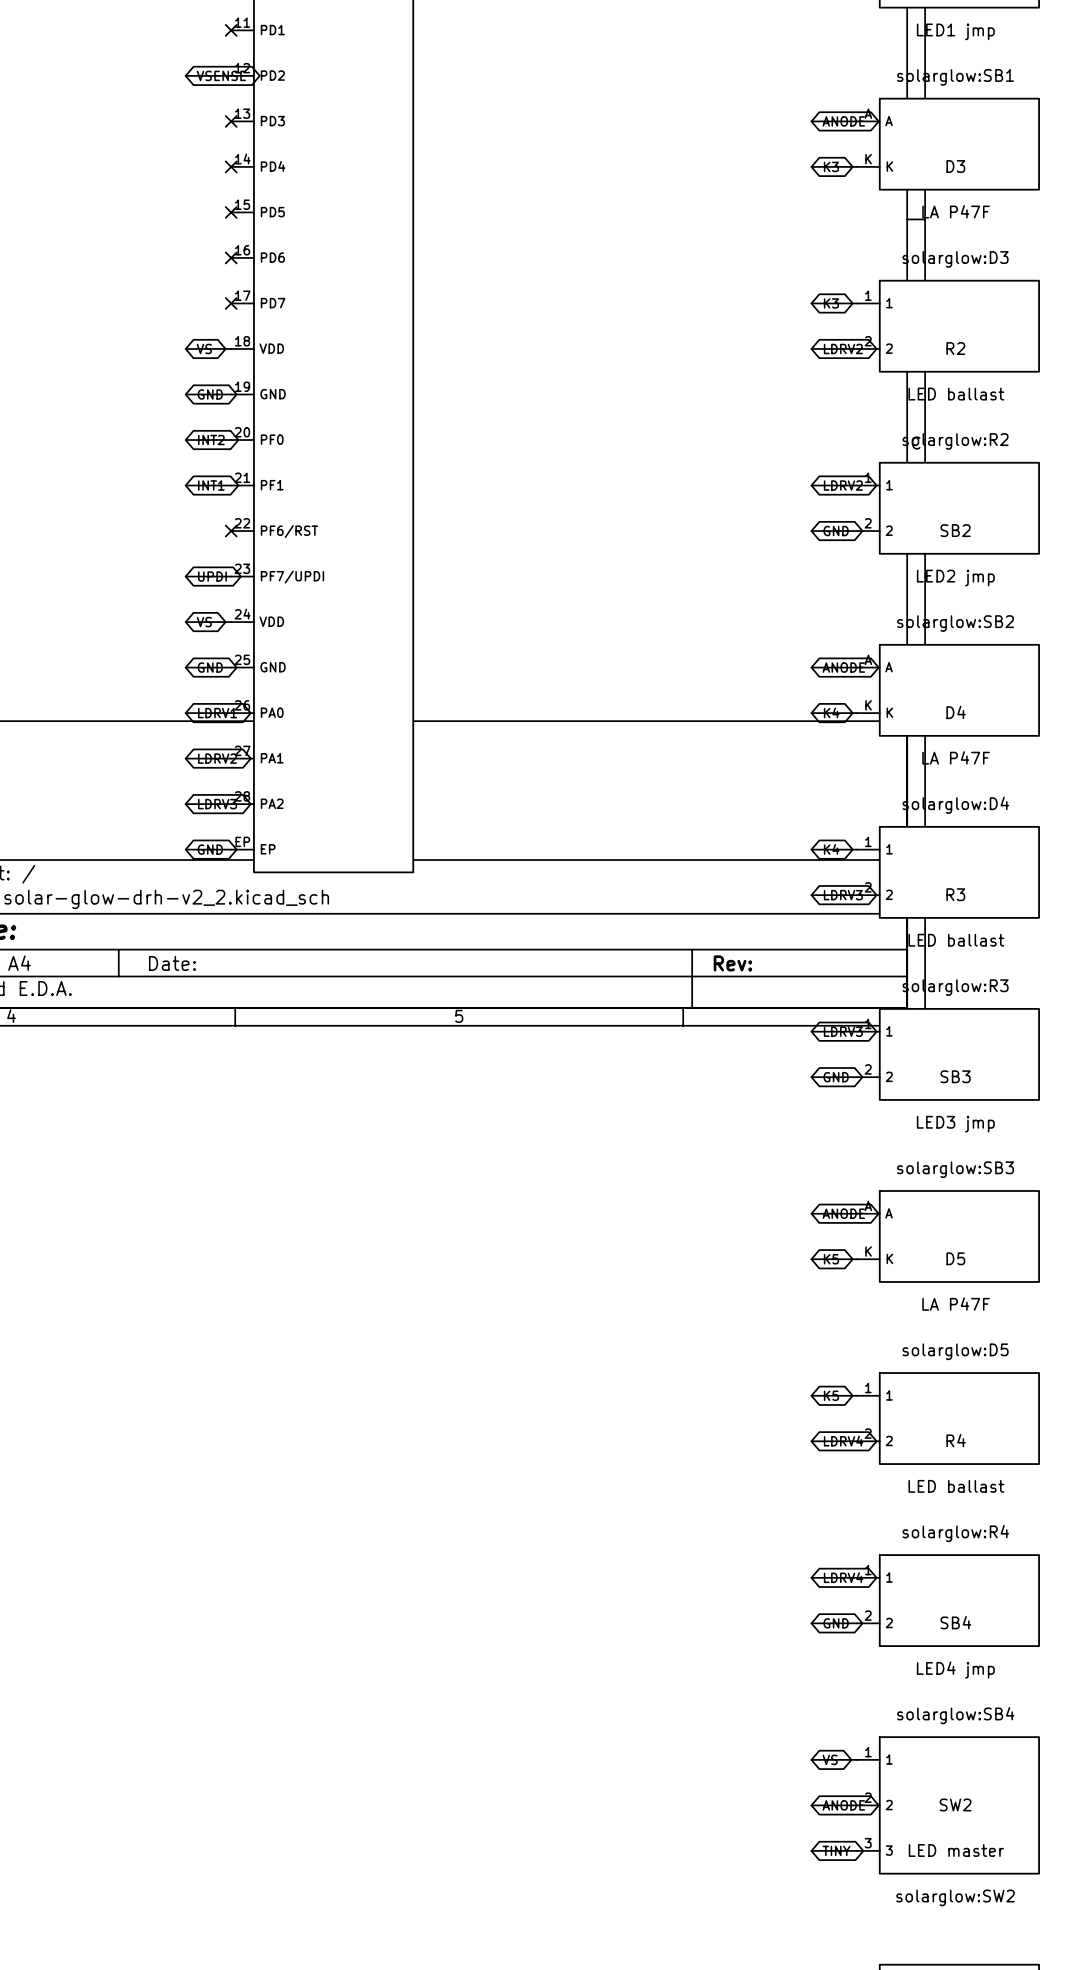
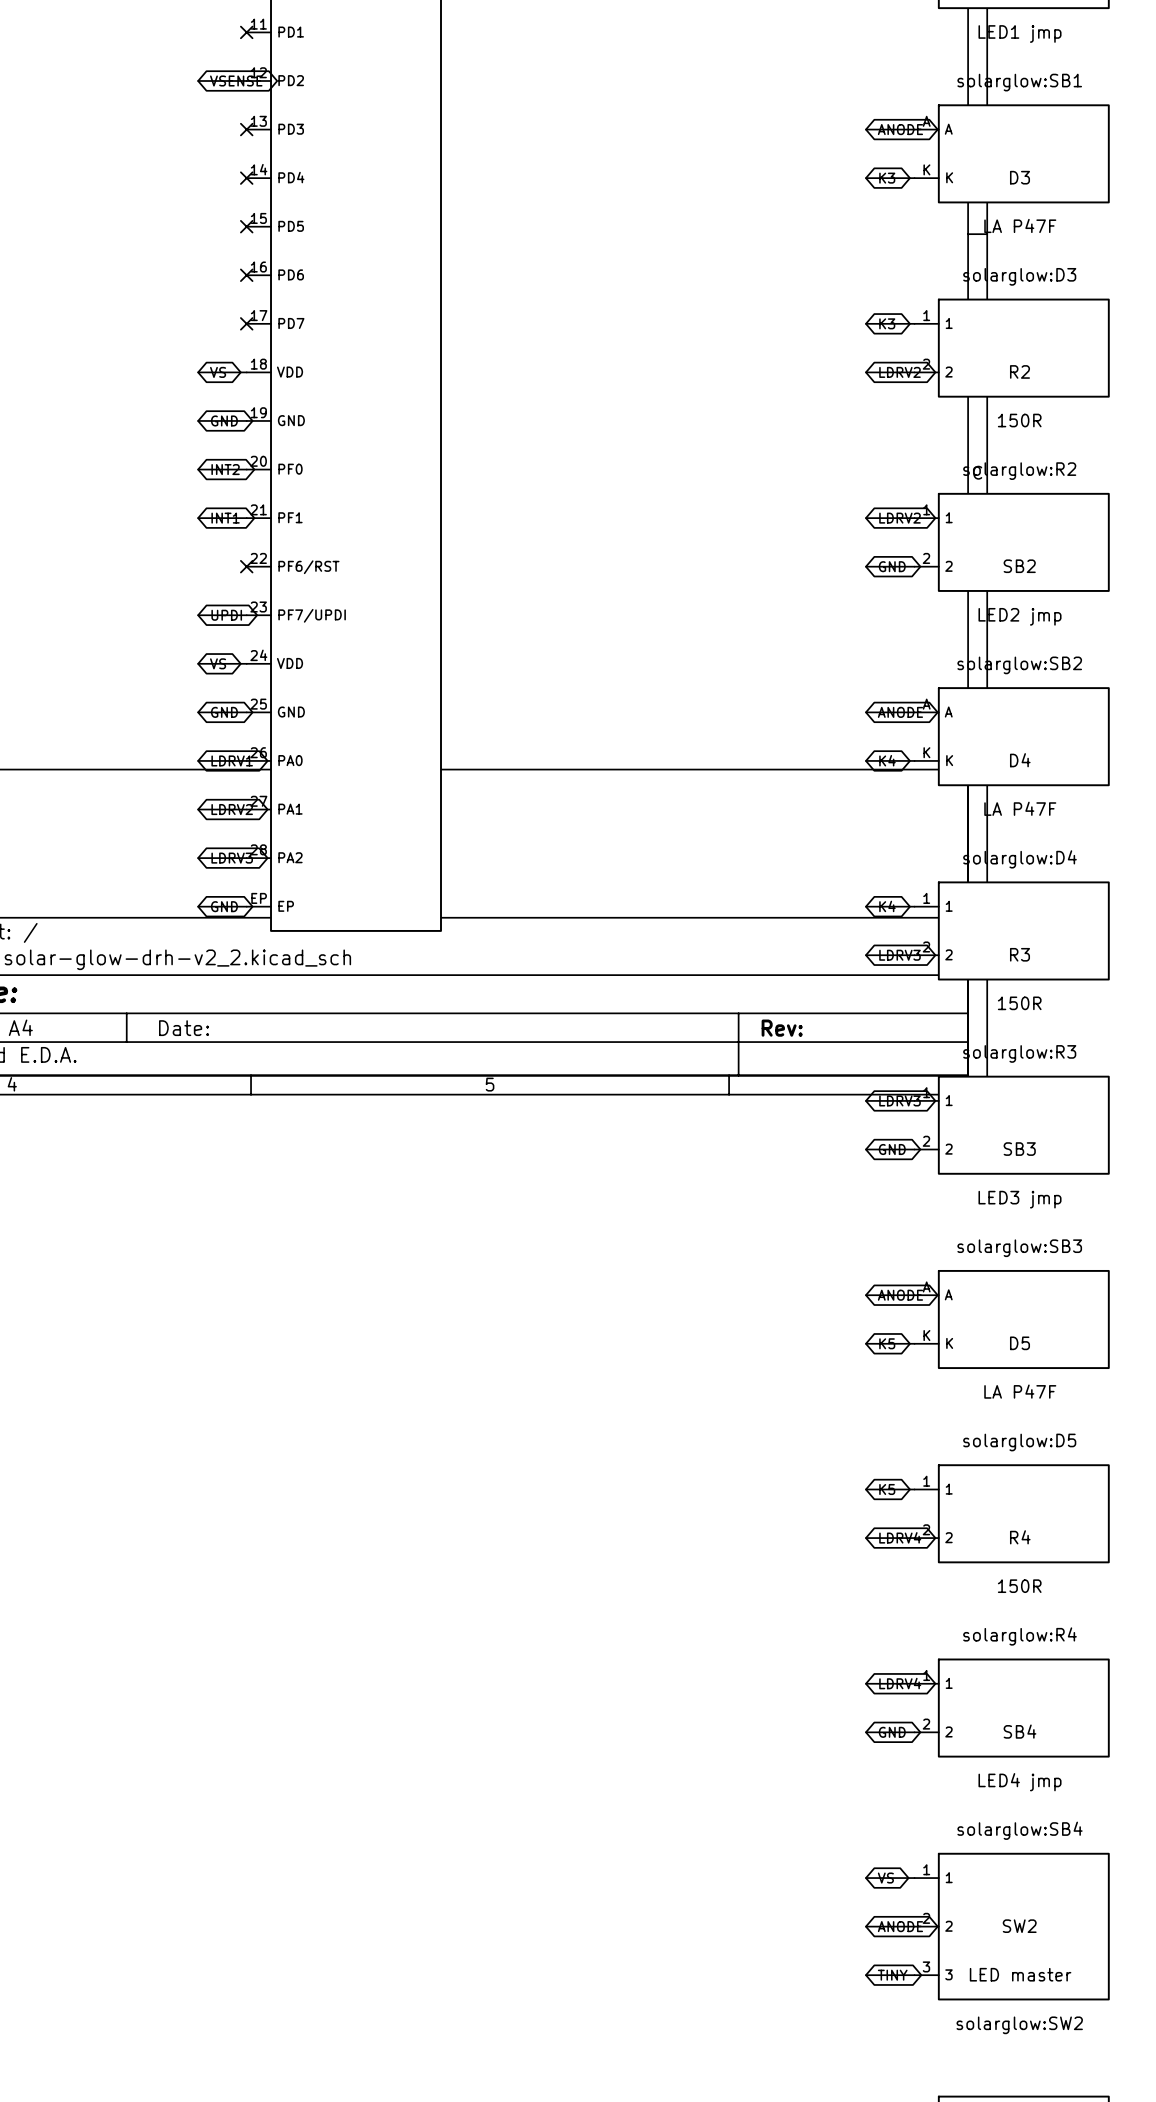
R2 value: LED ballast (956, 394) -> 150R (1019, 420)
R3 value: LED ballast (956, 940) -> 150R (1019, 1003)
R4 value: LED ballast (956, 1486) -> 150R (1019, 1586)

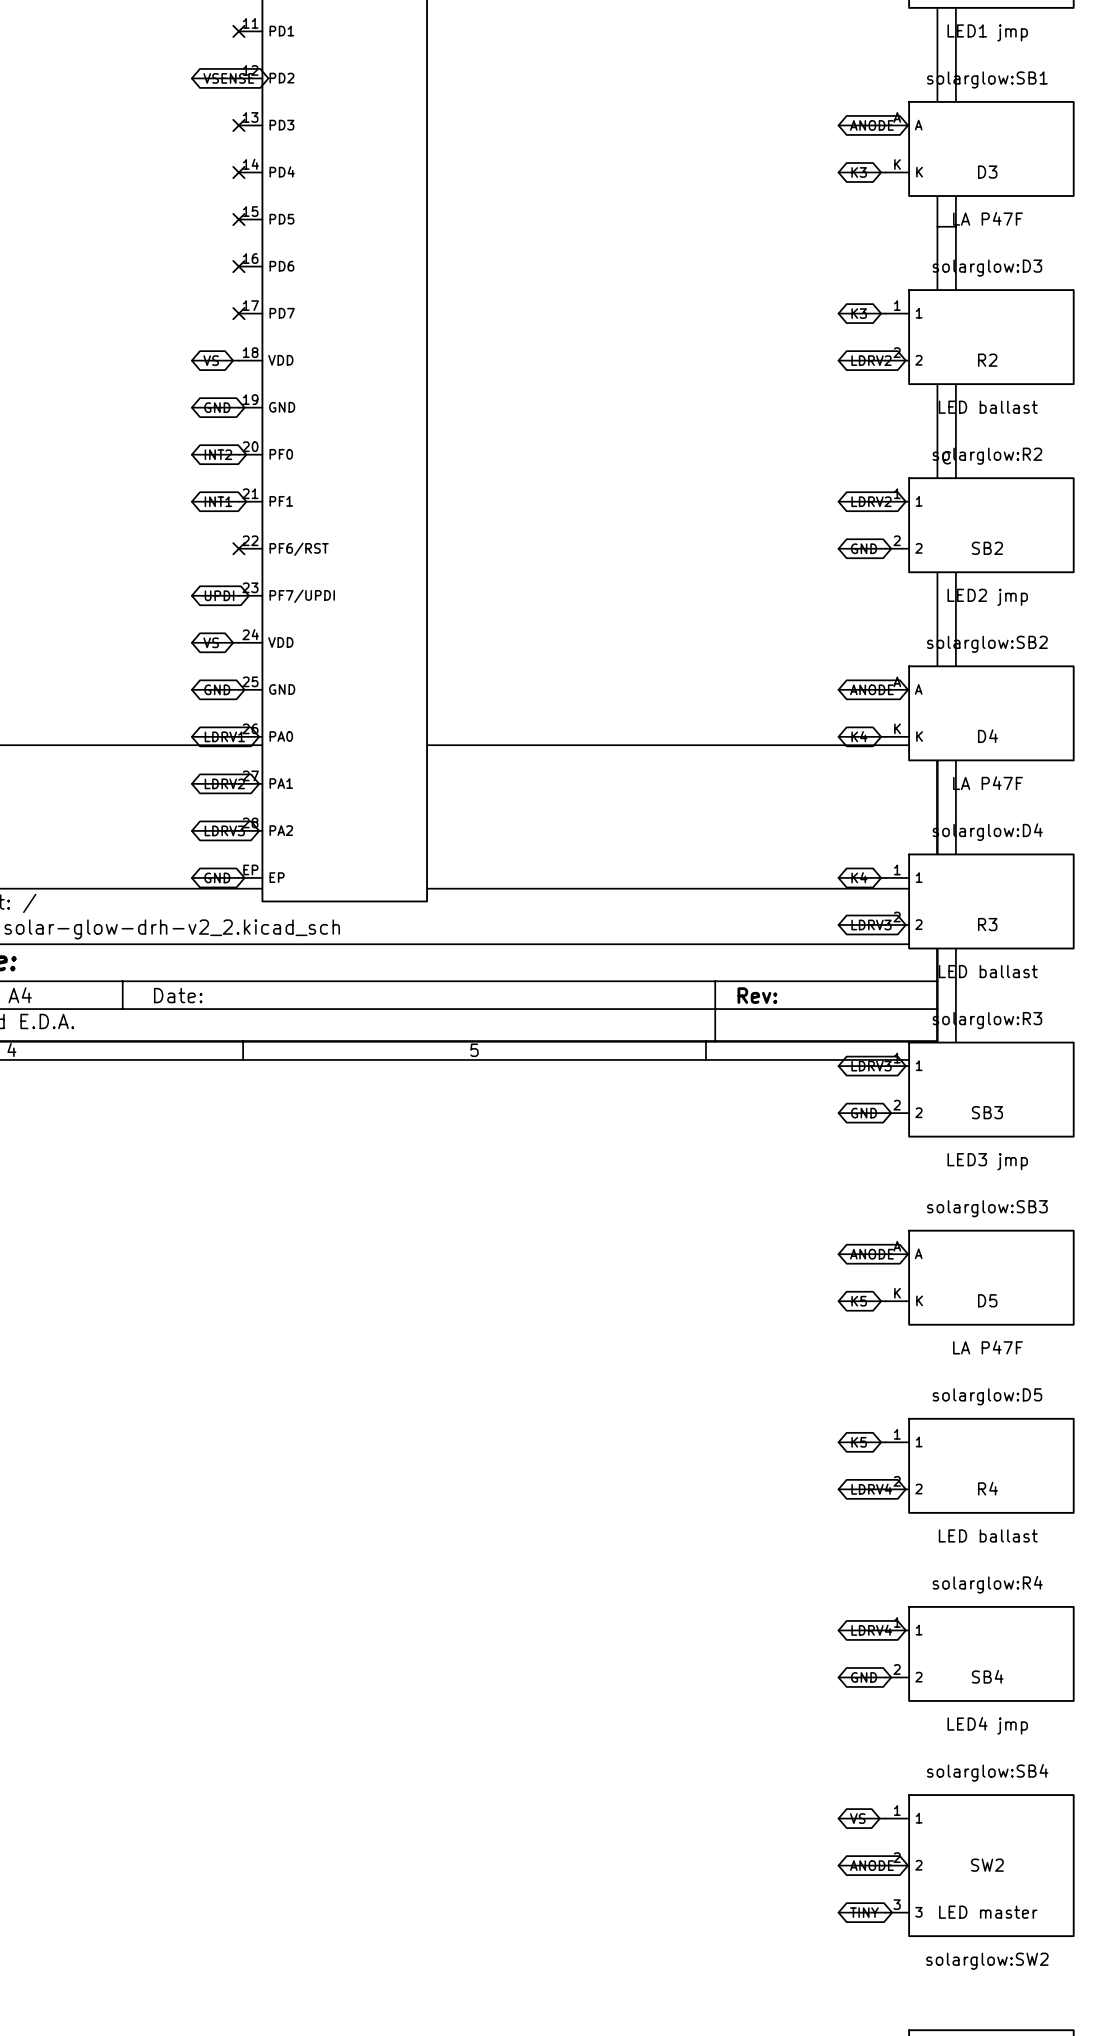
R2 value: 150R (1019, 420) -> LED ballast (988, 407)
R3 value: 150R (1019, 1003) -> LED ballast (988, 971)
R4 value: 150R (1019, 1586) -> LED ballast (988, 1535)

